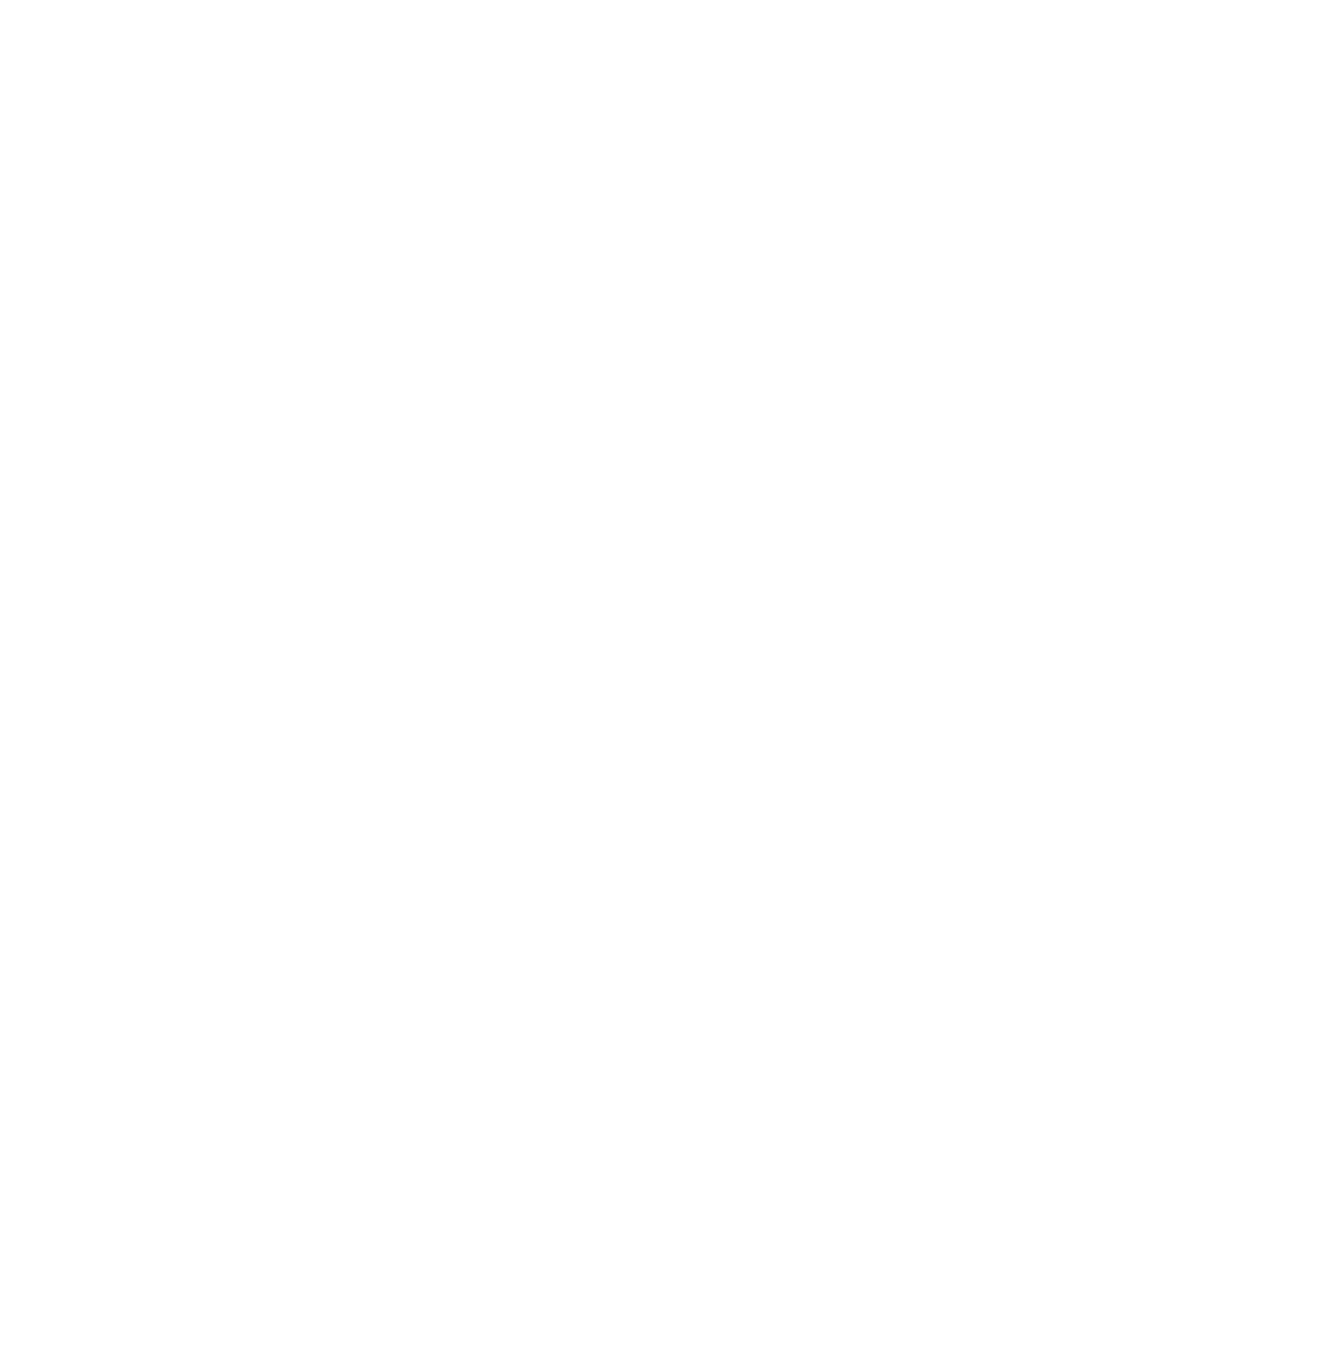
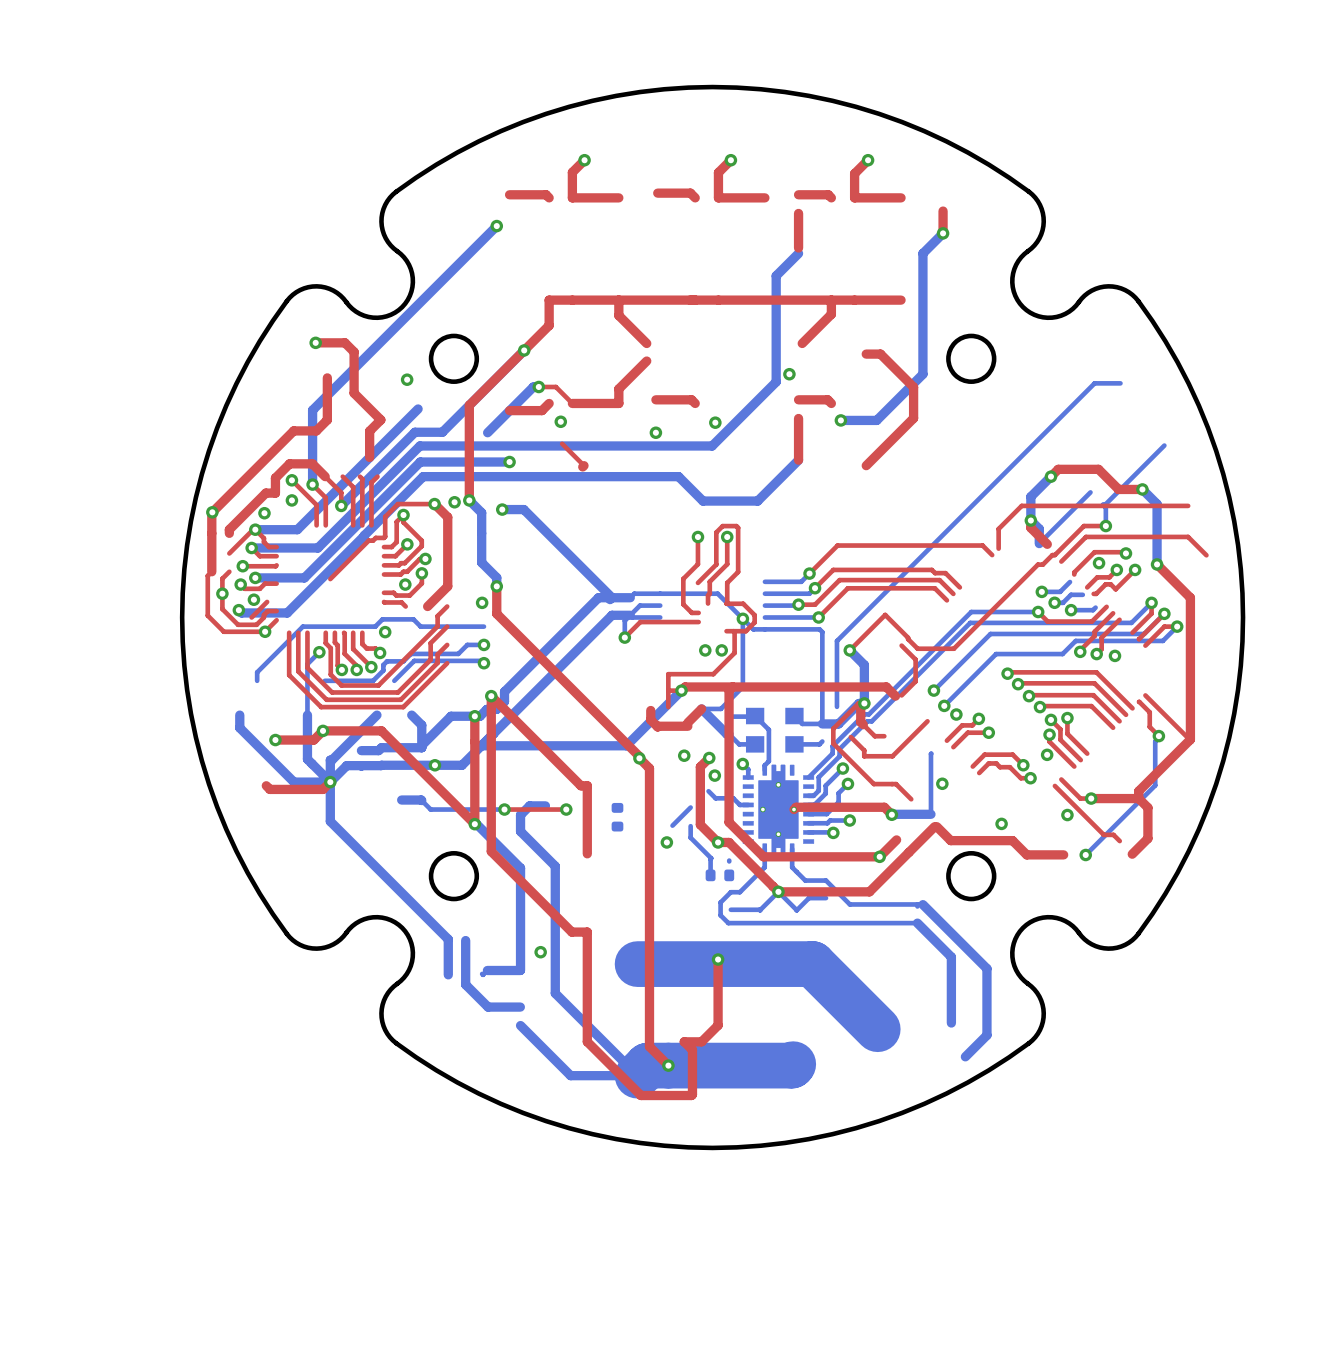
top track: none -> (584, 160) (572, 172) (572, 197) (618, 197)
via: none -> (584, 160)
top track: none -> (730, 160) (718, 172) (718, 197) (764, 197)
via: none -> (730, 160)
top track: none -> (868, 160) (854, 173) (854, 197) (901, 197)
via: none -> (868, 160)
board edge: none -> (396, 191) (436, 164) (500, 131) (545, 113) (592, 100) (640, 92) (688, 87) (736, 87) (785, 92) (856, 106) (924, 131) (988, 164) (1032, 194) (1039, 204) (1042, 213) (1042, 230) (1037, 242) (1016, 264) (1012, 282) (1017, 299) (1030, 312) (1047, 317) (1061, 315) (1072, 308) (1088, 292) (1104, 286) (1116, 287) (1125, 290) (1138, 301) (1165, 341) (1188, 383) (1208, 428) (1223, 474) (1234, 521) (1240, 569) (1243, 617) (1238, 689) (1223, 760) (1198, 829) (1165, 893) (1135, 937) (1125, 944) (1116, 947) (1099, 947) (1088, 942) (1065, 921) (1047, 917) (1030, 922) (1017, 935) (1012, 947) (1014, 965) (1021, 977) (1037, 992) (1043, 1008) (1042, 1021) (1039, 1030) (1028, 1043) (988, 1070) (946, 1093) (902, 1112) (856, 1128) (808, 1139) (760, 1145) (712, 1147) (640, 1142) (569, 1128) (500, 1103) (436, 1070) (392, 1040) (383, 1026) (381, 1017) (382, 1004) (388, 992) (409, 970) (412, 952) (407, 935) (394, 922) (382, 917) (364, 919) (352, 926) (337, 942) (321, 948) (308, 947) (300, 944) (286, 933) (259, 893) (236, 851) (217, 806) (195, 737) (187, 689) (182, 641) (182, 593) (187, 545) (201, 474) (226, 405) (259, 341) (289, 297) (296, 292) (308, 287) (325, 287) (337, 292) (359, 313) (377, 317) (394, 312) (407, 299) (412, 282) (410, 269) (403, 257) (388, 242) (381, 226) (382, 213) (385, 204) (396, 191)
top track: none -> (657, 193) (690, 193) (695, 197)
top track: none -> (509, 194) (546, 194) (549, 197)
top track: none -> (798, 194) (828, 194) (831, 197)
top track: none -> (943, 211) (943, 233)
top track: none -> (798, 213) (798, 248)
bottom track: none -> (496, 226) (312, 410) (312, 484)
via: none -> (496, 226)
bottom track: none -> (943, 233) (922, 253) (922, 374) (876, 420) (840, 420)
via: none -> (943, 233)
bottom track: none -> (798, 253) (776, 275) (776, 381) (712, 445) (419, 445) (317, 547) (251, 547)
top track: none -> (618, 300) (618, 315) (646, 343)
top track: none -> (831, 300) (831, 314) (802, 343)
top track: none -> (901, 300) (549, 300) (549, 325) (469, 405) (469, 500)
round board edge: none -> [428, 333, 480, 384]
round board edge: none -> [946, 333, 997, 384]
top track: none -> (315, 342) (344, 342) (354, 351) (354, 393) (380, 419) (369, 431) (369, 457)
via: none -> (315, 342)
bottom track: none -> (524, 350) (442, 432) (414, 432) (341, 505)
via: none -> (524, 350)
top track: none -> (866, 354) (880, 354) (913, 387) (913, 418) (866, 465)
top track: none -> (646, 361) (618, 388) (618, 403) (572, 403) (555, 386) (538, 386)
via: none -> (789, 374)
top track: none -> (327, 377) (327, 419) (316, 430) (293, 430) (211, 512) (211, 571) (207, 575) (207, 615) (223, 631) (265, 631) (276, 620)
via: none -> (407, 379)
bottom track: none -> (1120, 383) (1094, 383) (836, 641) (836, 706)
bottom track: none -> (538, 386) (533, 387) (487, 432)
via: none -> (538, 386)
top track: none -> (655, 399) (691, 399) (695, 403)
top track: none -> (798, 399) (827, 399) (831, 403)
top track: none -> (549, 403) (542, 410) (509, 410)
bottom track: none -> (418, 408) (297, 529) (255, 529)
top track: none -> (798, 418) (798, 460)
via: none -> (840, 420)
via: none -> (560, 421)
via: none -> (715, 422)
via: none -> (655, 432)
top track: none -> (562, 443) (584, 465) (582, 466)
bottom track: none -> (1164, 445) (1105, 504) (1102, 504) (1105, 507) (1105, 526)
bottom track: none -> (798, 460) (757, 501) (702, 501) (678, 476) (423, 476) (287, 612) (241, 612) (238, 610)
bottom track: none -> (509, 462) (420, 462) (304, 577) (255, 577)
via: none -> (509, 462)
top track: none -> (342, 476) (353, 487) (353, 525)
top track: none -> (359, 476) (362, 479) (362, 525)
top track: none -> (377, 476) (371, 482) (371, 525)
top track: none -> (1050, 476) (1058, 469) (1098, 469) (1118, 489) (1142, 489)
bottom track: none -> (1050, 476) (1030, 496) (1030, 520) (1039, 528) (1039, 543) (1090, 492)
via: none -> (1050, 476)
top track: none -> (291, 480) (316, 505) (316, 525)
via: none -> (291, 480)
top track: none -> (312, 484) (325, 497) (325, 525)
via: none -> (312, 484)
bottom track: none -> (1142, 489) (1157, 504) (1157, 564)
via: none -> (1142, 489)
via: none -> (291, 500)
bottom track: none -> (469, 500) (481, 512) (481, 562) (496, 577) (496, 586)
via: none -> (469, 500)
via: none -> (454, 502)
via: none -> (434, 504)
top track: none -> (341, 505) (341, 492) (312, 463) (289, 463) (275, 478) (275, 493) (265, 493) (229, 529) (229, 533)
via: none -> (341, 505)
top track: none -> (1188, 505) (1021, 505) (998, 528) (998, 548)
bottom track: none -> (502, 509) (523, 509) (612, 597) (610, 599)
via: none -> (502, 509)
via: none -> (212, 512)
via: none -> (264, 513)
via: none -> (403, 515)
top track: none -> (1030, 520) (1030, 527) (1047, 544)
via: none -> (1030, 520)
top track: none -> (1105, 526) (1083, 526) (1054, 555) (1052, 555) (1042, 564) (1037, 564) (953, 648) (917, 648) (885, 614) (849, 650)
via: none -> (1105, 526)
via: none -> (255, 529)
top track: none -> (697, 537) (697, 564) (683, 578) (683, 604) (691, 612) (698, 612)
via: none -> (697, 537)
top track: none -> (727, 537) (727, 564) (709, 581) (708, 603)
via: none -> (727, 537)
top track: none -> (407, 544) (395, 556) (384, 556)
via: none -> (407, 544)
top track: none -> (251, 547) (259, 556) (276, 556)
via: none -> (251, 547)
top track: none -> (276, 547) (268, 547) (263, 542) (263, 538) (253, 529) (229, 553)
top track: none -> (384, 547) (391, 547) (396, 542) (396, 521) (403, 515) (403, 522) (421, 540) (421, 546) (404, 563) (398, 565) (384, 565)
top track: none -> (1125, 553) (1094, 552) (1074, 574)
via: none -> (1125, 553)
top track: none -> (992, 555) (982, 545) (837, 545) (809, 573)
top track: none -> (1206, 555) (1188, 536) (1085, 536) (1061, 561)
top track: none -> (425, 558) (419, 558) (407, 571) (400, 574) (384, 574)
via: none -> (425, 558)
via: none -> (1099, 563)
top track: none -> (1157, 564) (1190, 597) (1190, 739) (1138, 791) (1138, 798)
via: none -> (1157, 564)
top track: none -> (276, 565) (242, 566)
via: none -> (242, 566)
top track: none -> (1116, 569) (1109, 577) (1097, 577) (1087, 587)
via: none -> (1116, 569)
top track: none -> (1135, 569) (1115, 589) (1110, 584) (1105, 584) (1096, 593) (1093, 593)
via: none -> (1135, 569)
top track: none -> (229, 571) (222, 578) (222, 609) (238, 624) (256, 624) (267, 611) (276, 611)
top track: none -> (421, 573) (421, 583) (409, 595) (384, 592)
via: none -> (421, 573)
bottom track: none -> (809, 573) (801, 581) (764, 581)
via: none -> (809, 573)
via: none -> (255, 577)
top track: none -> (330, 579) (368, 540) (385, 536) (385, 516) (397, 504) (434, 504) (447, 517) (447, 586) (427, 606)
top track: none -> (697, 582) (716, 564) (716, 532) (722, 526) (736, 526) (738, 527) (738, 572) (727, 582) (726, 603) (743, 603) (754, 615) (754, 622) (745, 631) (726, 631)
bottom track: none -> (1069, 582) (1060, 591) (1041, 591)
top track: none -> (276, 583) (265, 583) (259, 588) (244, 588) (240, 584)
via: none -> (240, 584)
via: none -> (405, 584)
top track: none -> (496, 586) (496, 613) (649, 768) (649, 1046) (668, 1065)
via: none -> (496, 586)
top track: none -> (959, 587) (945, 573) (935, 573) (931, 569) (833, 569) (815, 588)
bottom track: none -> (815, 588) (809, 593) (764, 593)
via: none -> (815, 588)
via: none -> (1041, 591)
via: none -> (222, 593)
top track: none -> (953, 593) (939, 580) (839, 580) (815, 604) (798, 604)
bottom track: none -> (1082, 594) (1071, 594) (1062, 602) (1054, 602)
via: none -> (253, 599)
top track: none -> (946, 600) (934, 588) (847, 588) (818, 617)
top track: none -> (267, 601) (251, 617)
top track: none -> (384, 601) (401, 602) (405, 606)
via: none -> (482, 602)
via: none -> (1054, 602)
top track: none -> (1151, 602) (1151, 613) (1132, 632)
bottom track: none -> (1151, 602) (1131, 622) (970, 622) (871, 721) (867, 721) (839, 749) (839, 756) (818, 777) (818, 790) (813, 795) (808, 795)
via: none -> (1151, 602)
bottom track: none -> (798, 604) (764, 605)
via: none -> (798, 604)
bottom track: none -> (660, 605) (639, 605) (624, 620) (624, 637)
top track: none -> (447, 606) (437, 616) (437, 626) (378, 685) (341, 685) (330, 674) (330, 648) (325, 643) (325, 632)
top track: none -> (1106, 606) (1091, 621) (1047, 621) (1038, 612)
bottom track: none -> (1095, 607) (1093, 610) (1071, 610)
via: none -> (238, 610)
via: none -> (1071, 610)
bottom track: none -> (1038, 612) (971, 612) (868, 714) (864, 714) (832, 746) (832, 753) (808, 777)
via: none -> (1038, 612)
top track: none -> (1113, 613) (1094, 631) (1094, 635) (1080, 651)
top track: none -> (1164, 613) (1139, 639)
bottom track: none -> (1164, 613) (1144, 633) (990, 633) (933, 690)
via: none -> (1164, 613)
bottom track: none -> (660, 617) (612, 615) (462, 765) (361, 766)
bottom track: none -> (764, 617) (818, 617)
via: none -> (818, 617)
bottom track: none -> (742, 618) (742, 686) (720, 708) (701, 708) (739, 744) (755, 744)
via: none -> (742, 618)
top track: none -> (1119, 619) (1101, 637) (1101, 649) (1096, 654)
top track: none -> (698, 622) (640, 622) (624, 637)
top track: none -> (447, 626) (430, 643) (430, 659) (397, 692) (332, 692) (307, 667) (307, 632)
bottom track: none -> (483, 626) (420, 626) (413, 619) (382, 619) (375, 626) (302, 626) (257, 672) (257, 680)
top track: none -> (1177, 626) (1164, 626) (1145, 645)
bottom track: none -> (1177, 626) (1162, 640) (1075, 640) (1062, 654) (996, 654) (944, 705)
via: none -> (1177, 626)
via: none -> (265, 631)
top track: none -> (733, 631) (734, 652) (713, 674) (668, 674) (668, 707)
top track: none -> (289, 632) (289, 675) (321, 707) (403, 707) (447, 663)
top track: none -> (298, 632) (298, 671) (326, 699) (400, 699) (437, 662) (437, 654) (447, 644)
top track: none -> (334, 632) (334, 642) (337, 645) (337, 665) (341, 669)
top track: none -> (344, 632) (344, 653) (356, 665) (356, 669)
top track: none -> (353, 632) (353, 648) (371, 667)
top track: none -> (362, 632) (362, 644) (366, 648) (375, 648) (380, 652)
via: none -> (385, 632)
via: none -> (624, 637)
bottom track: none -> (483, 644) (467, 644) (458, 653) (410, 653) (403, 661) (387, 661) (383, 665) (383, 670) (373, 680) (324, 680)
via: none -> (483, 644)
top track: none -> (901, 645) (915, 659) (915, 681) (901, 695)
via: none -> (705, 650)
via: none -> (721, 650)
bottom track: none -> (849, 650) (864, 665) (864, 703) (859, 703) (838, 723) (822, 723)
via: none -> (849, 650)
via: none -> (1080, 651)
bottom track: none -> (319, 652) (307, 664) (307, 759) (330, 782)
via: none -> (319, 652)
via: none -> (380, 652)
via: none -> (1096, 654)
via: none -> (1114, 655)
bottom track: none -> (483, 663) (481, 660) (414, 660) (394, 680)
via: none -> (483, 663)
via: none -> (371, 667)
via: none -> (341, 669)
via: none -> (356, 669)
top track: none -> (1007, 673) (1096, 672) (1132, 708)
via: none -> (1007, 673)
top track: none -> (1018, 684) (1094, 683) (1126, 714)
via: none -> (1018, 684)
top track: none -> (732, 686) (729, 690) (729, 822) (763, 856) (879, 856) (896, 839)
top track: none -> (668, 690) (681, 690) (685, 686) (886, 686) (895, 696)
bottom track: none -> (681, 690) (626, 745) (478, 745) (481, 745)
via: none -> (681, 690)
via: none -> (933, 690)
top track: none -> (1145, 695) (1189, 739)
via: none -> (491, 696)
top track: none -> (1029, 696) (1093, 695) (1119, 721)
via: none -> (1029, 696)
top track: none -> (1139, 701) (1149, 712) (1149, 726) (1158, 736)
via: none -> (864, 703)
via: none -> (944, 705)
top track: none -> (1040, 707) (1091, 706) (1113, 727)
via: none -> (1040, 707)
top track: none -> (701, 708) (687, 722) (687, 726) (657, 726) (650, 720) (650, 710)
via: none -> (956, 714)
bottom track: none -> (239, 715) (239, 727) (293, 782) (330, 782)
bottom track: none -> (376, 715) (330, 760) (330, 821) (448, 939) (448, 974)
bottom track: none -> (411, 715) (421, 725) (421, 747) (381, 747) (378, 750) (361, 750)
top track: none -> (474, 716) (474, 824) (381, 730) (323, 730) (313, 740) (275, 740)
via: none -> (474, 716)
bottom track: none -> (729, 716) (755, 716) (768, 729) (768, 761) (764, 765) (764, 770)
bottom track: none -> (794, 716) (802, 723) (822, 723)
via: none -> (978, 718)
top track: none -> (979, 718) (972, 725) (962, 725) (946, 740)
top track: none -> (1067, 718) (1067, 733) (1087, 753)
via: none -> (1067, 718)
top track: none -> (1050, 719) (1060, 729) (1060, 739) (1080, 760)
via: none -> (1050, 719)
top track: none -> (927, 721) (892, 756) (864, 756) (864, 750) (850, 737)
bottom track: none -> (822, 723) (822, 632) (819, 629) (753, 629) (717, 593) (634, 593) (630, 597) (598, 597) (504, 691) (504, 701) (496, 709) (486, 709) (480, 716) (451, 716) (421, 745)
via: none -> (323, 730)
part: none -> (774, 730)
top track: none -> (988, 732) (967, 732) (953, 747)
via: none -> (988, 732)
top track: none -> (1049, 734) (1049, 741) (1074, 766)
via: none -> (1049, 734)
top track: none -> (884, 736) (874, 736) (860, 722) (860, 707) (864, 703) (858, 703) (833, 728) (833, 743) (873, 784) (896, 784) (911, 799)
bottom track: none -> (1158, 736) (1155, 741) (1155, 785) (1085, 854)
via: none -> (1158, 736)
via: none -> (275, 740)
bottom track: none -> (822, 741) (819, 744) (794, 744)
bottom track: none -> (931, 753) (930, 814) (891, 814) (895, 814)
via: none -> (1047, 754)
via: none -> (684, 755)
via: none -> (639, 758)
top track: none -> (709, 758) (700, 766) (700, 824) (718, 842) (729, 842) (778, 891) (869, 891) (934, 826) (950, 840) (1012, 840) (1026, 854) (1063, 854)
via: none -> (709, 758)
bottom track: none -> (742, 764) (748, 769) (748, 777)
via: none -> (742, 764)
via: none -> (434, 765)
top track: none -> (1023, 765) (1012, 754) (984, 754) (972, 766)
via: none -> (1023, 765)
bottom track: none -> (361, 766) (346, 765) (330, 782)
bottom track: none -> (842, 768) (825, 785) (825, 793) (814, 804) (808, 804)
via: none -> (842, 768)
top track: none -> (979, 773) (988, 763) (996, 763) (1000, 767) (1009, 767) (1020, 778) (1030, 778) (1030, 776)
via: none -> (714, 775)
via: none -> (1030, 778)
top track: none -> (1061, 779) (1080, 798) (1138, 798)
top track: none -> (330, 782) (323, 789) (269, 789) (266, 785)
via: none -> (330, 782)
bottom track: none -> (847, 783) (838, 793) (838, 802) (826, 814) (808, 814)
via: none -> (847, 783)
via: none -> (942, 783)
top track: none -> (1054, 785) (1103, 834) (1113, 834) (1119, 841)
bottom track: none -> (708, 791) (715, 798) (733, 798) (739, 804) (748, 804)
via: none -> (1091, 798)
top track: none -> (1138, 798) (1147, 807) (1147, 838) (1132, 854)
bottom track: none -> (401, 800) (421, 800) (430, 809) (504, 809)
bottom track: none -> (545, 805) (529, 805) (520, 815) (520, 831) (555, 866) (555, 993) (637, 1075)
bottom track: none -> (690, 807) (672, 825)
top track: none -> (504, 809) (566, 809)
via: none -> (504, 809)
via: none -> (566, 809)
part: none -> (778, 809)
top track: none -> (793, 809) (796, 807) (884, 807) (891, 814)
via: none -> (891, 814)
via: none -> (1067, 815)
part: none -> (617, 817)
bottom track: none -> (849, 820) (808, 823)
via: none -> (849, 820)
via: none -> (1001, 823)
bottom track: none -> (474, 824) (520, 868) (519, 969)
via: none -> (474, 824)
bottom track: none -> (690, 826) (690, 837) (711, 858) (710, 875)
bottom track: none -> (808, 832) (833, 832)
via: none -> (833, 832)
via: none -> (666, 842)
via: none -> (718, 842)
bottom track: none -> (764, 848) (764, 867) (739, 892) (730, 892) (720, 902) (720, 915) (728, 923) (917, 923) (951, 957) (951, 1023)
bottom track: none -> (792, 848) (792, 867) (805, 880) (826, 880) (849, 904) (917, 904) (917, 906)
round board edge: none -> [428, 851, 480, 902]
round board edge: none -> [946, 851, 997, 902]
top track: none -> (587, 853) (587, 785) (580, 785) (491, 696) (491, 851) (571, 932) (587, 932) (587, 1041) (640, 1095) (692, 1094) (692, 1050) (684, 1041) (701, 1041) (718, 1025) (718, 959)
via: none -> (1085, 854)
via: none -> (879, 856)
bottom track: none -> (729, 860) (729, 861)
part: none -> (719, 875)
via: none -> (778, 891)
bottom track: none -> (826, 898) (808, 898) (796, 910)
bottom track: none -> (922, 904) (986, 968) (986, 1035) (965, 1056)
bottom track: none -> (730, 909) (760, 910)
bottom track: none -> (760, 910) (778, 891) (796, 910)
bottom track: none -> (465, 940) (465, 984) (488, 1007) (520, 1007)
via: none -> (540, 952)
via: none -> (718, 959)
bottom track: none -> (637, 964) (812, 964) (877, 1029)
bottom track: none -> (520, 970) (487, 970) (482, 973)
bottom track: none -> (520, 1025) (570, 1075) (637, 1075)
bottom track: none -> (793, 1064) (647, 1065) (637, 1075)
via: none -> (668, 1065)

